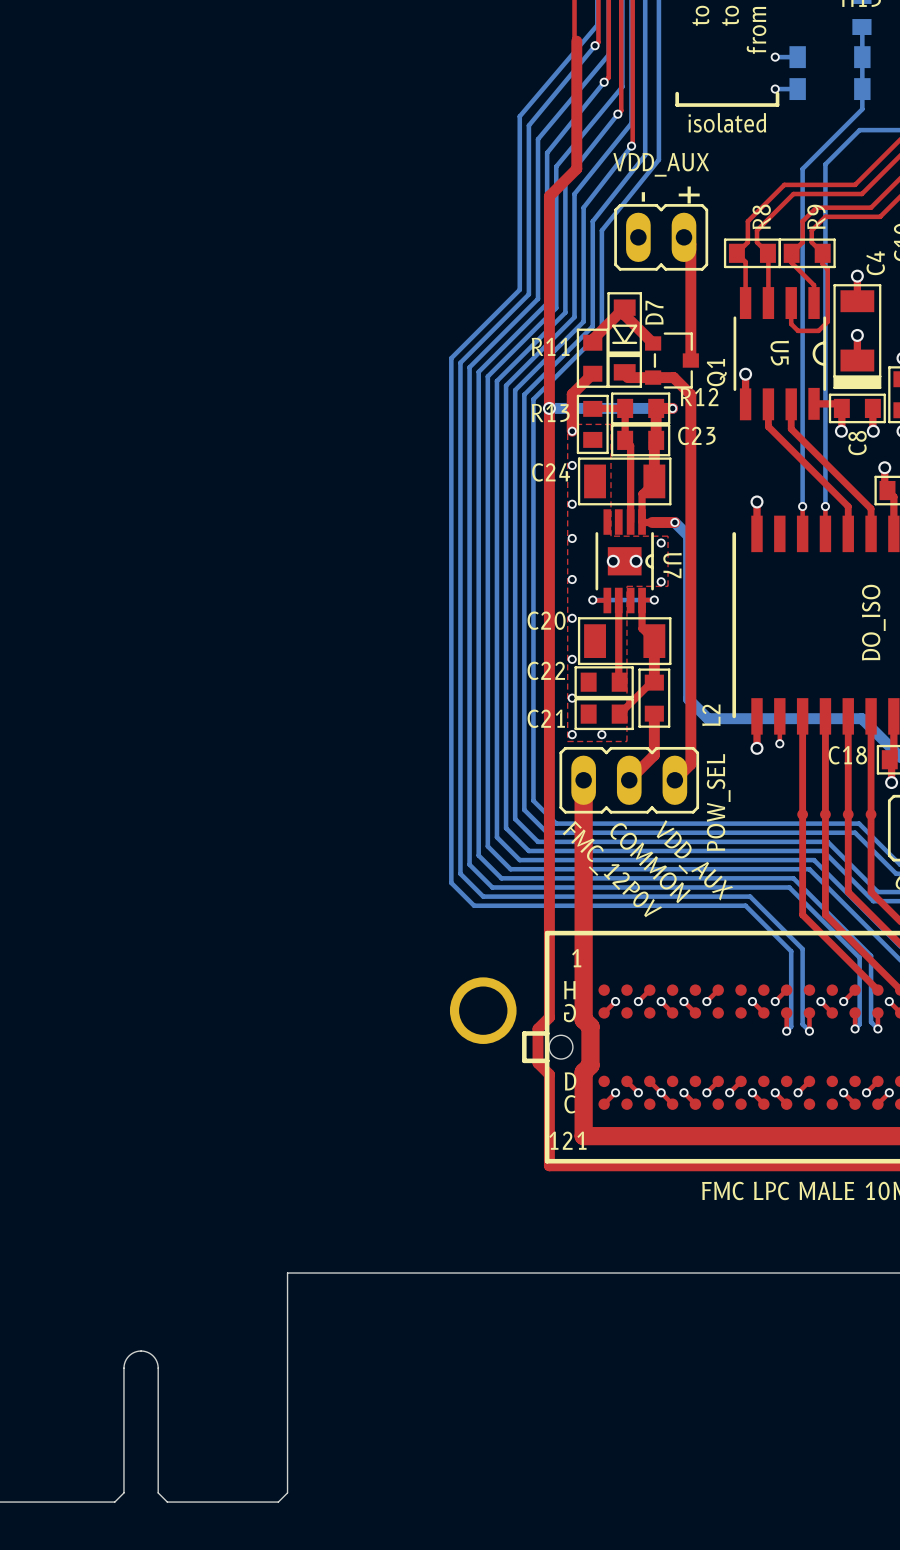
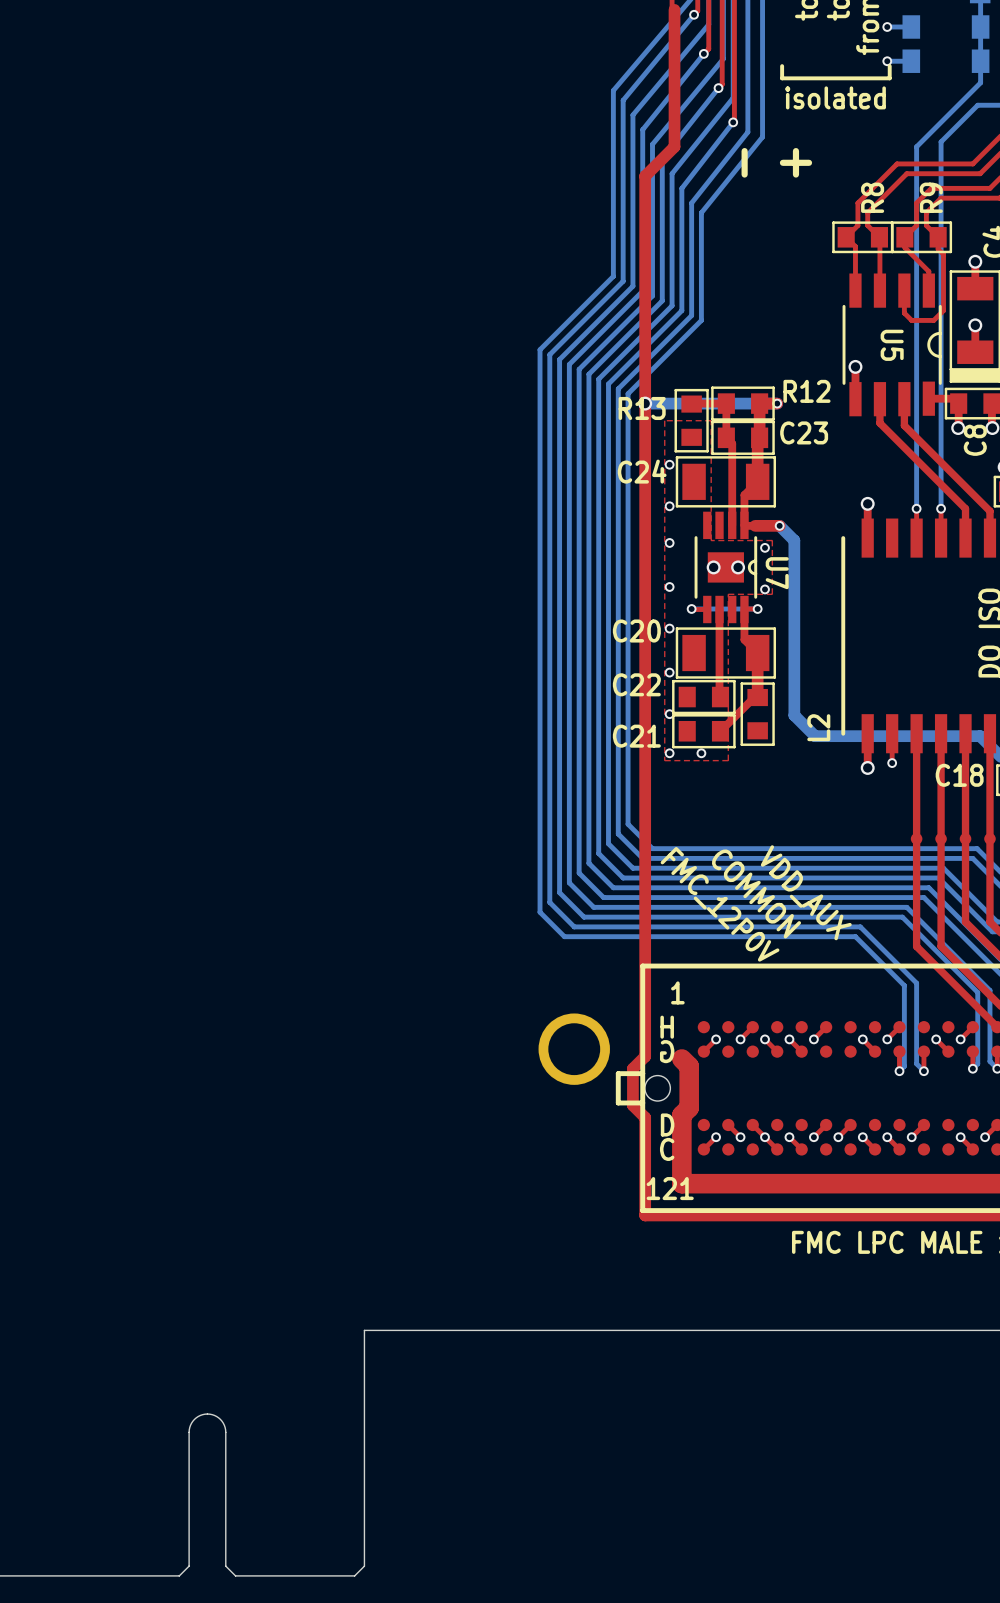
VDD_AUX: (661, 237) -> none
top track: (684, 237) (690, 244) (690, 360) -> none
D7: (624, 339) -> none
top track: (592, 342) (592, 339) (624, 307) (624, 315) (653, 343) -> none
R11: (592, 358) -> none
Q1: (671, 360) -> none
top track: (592, 373) (572, 394) (572, 431) -> none
top track: (627, 377) (624, 372) (629, 377) (673, 377) (690, 394) (690, 764) (674, 780) -> none
via: (572, 431) -> none
top track: (654, 713) (654, 755) (629, 780) -> none
top track: (583, 780) (583, 1019) -> none
POW_SEL: (629, 780) -> none

